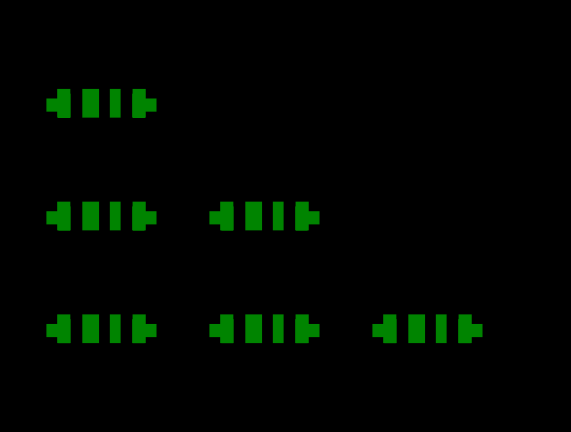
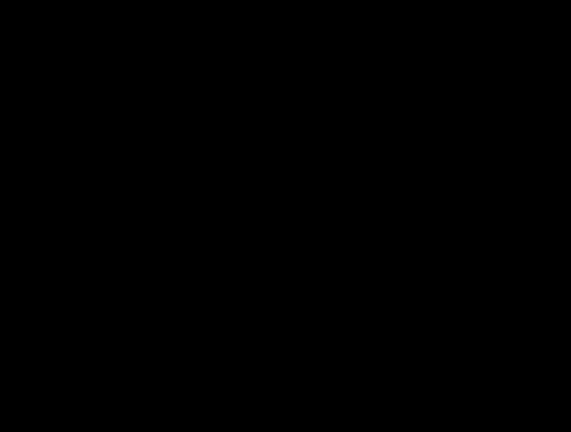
part: (101, 103) -> none
part: (101, 216) -> none
part: (264, 216) -> none
part: (101, 328) -> none
part: (264, 328) -> none
part: (427, 328) -> none

